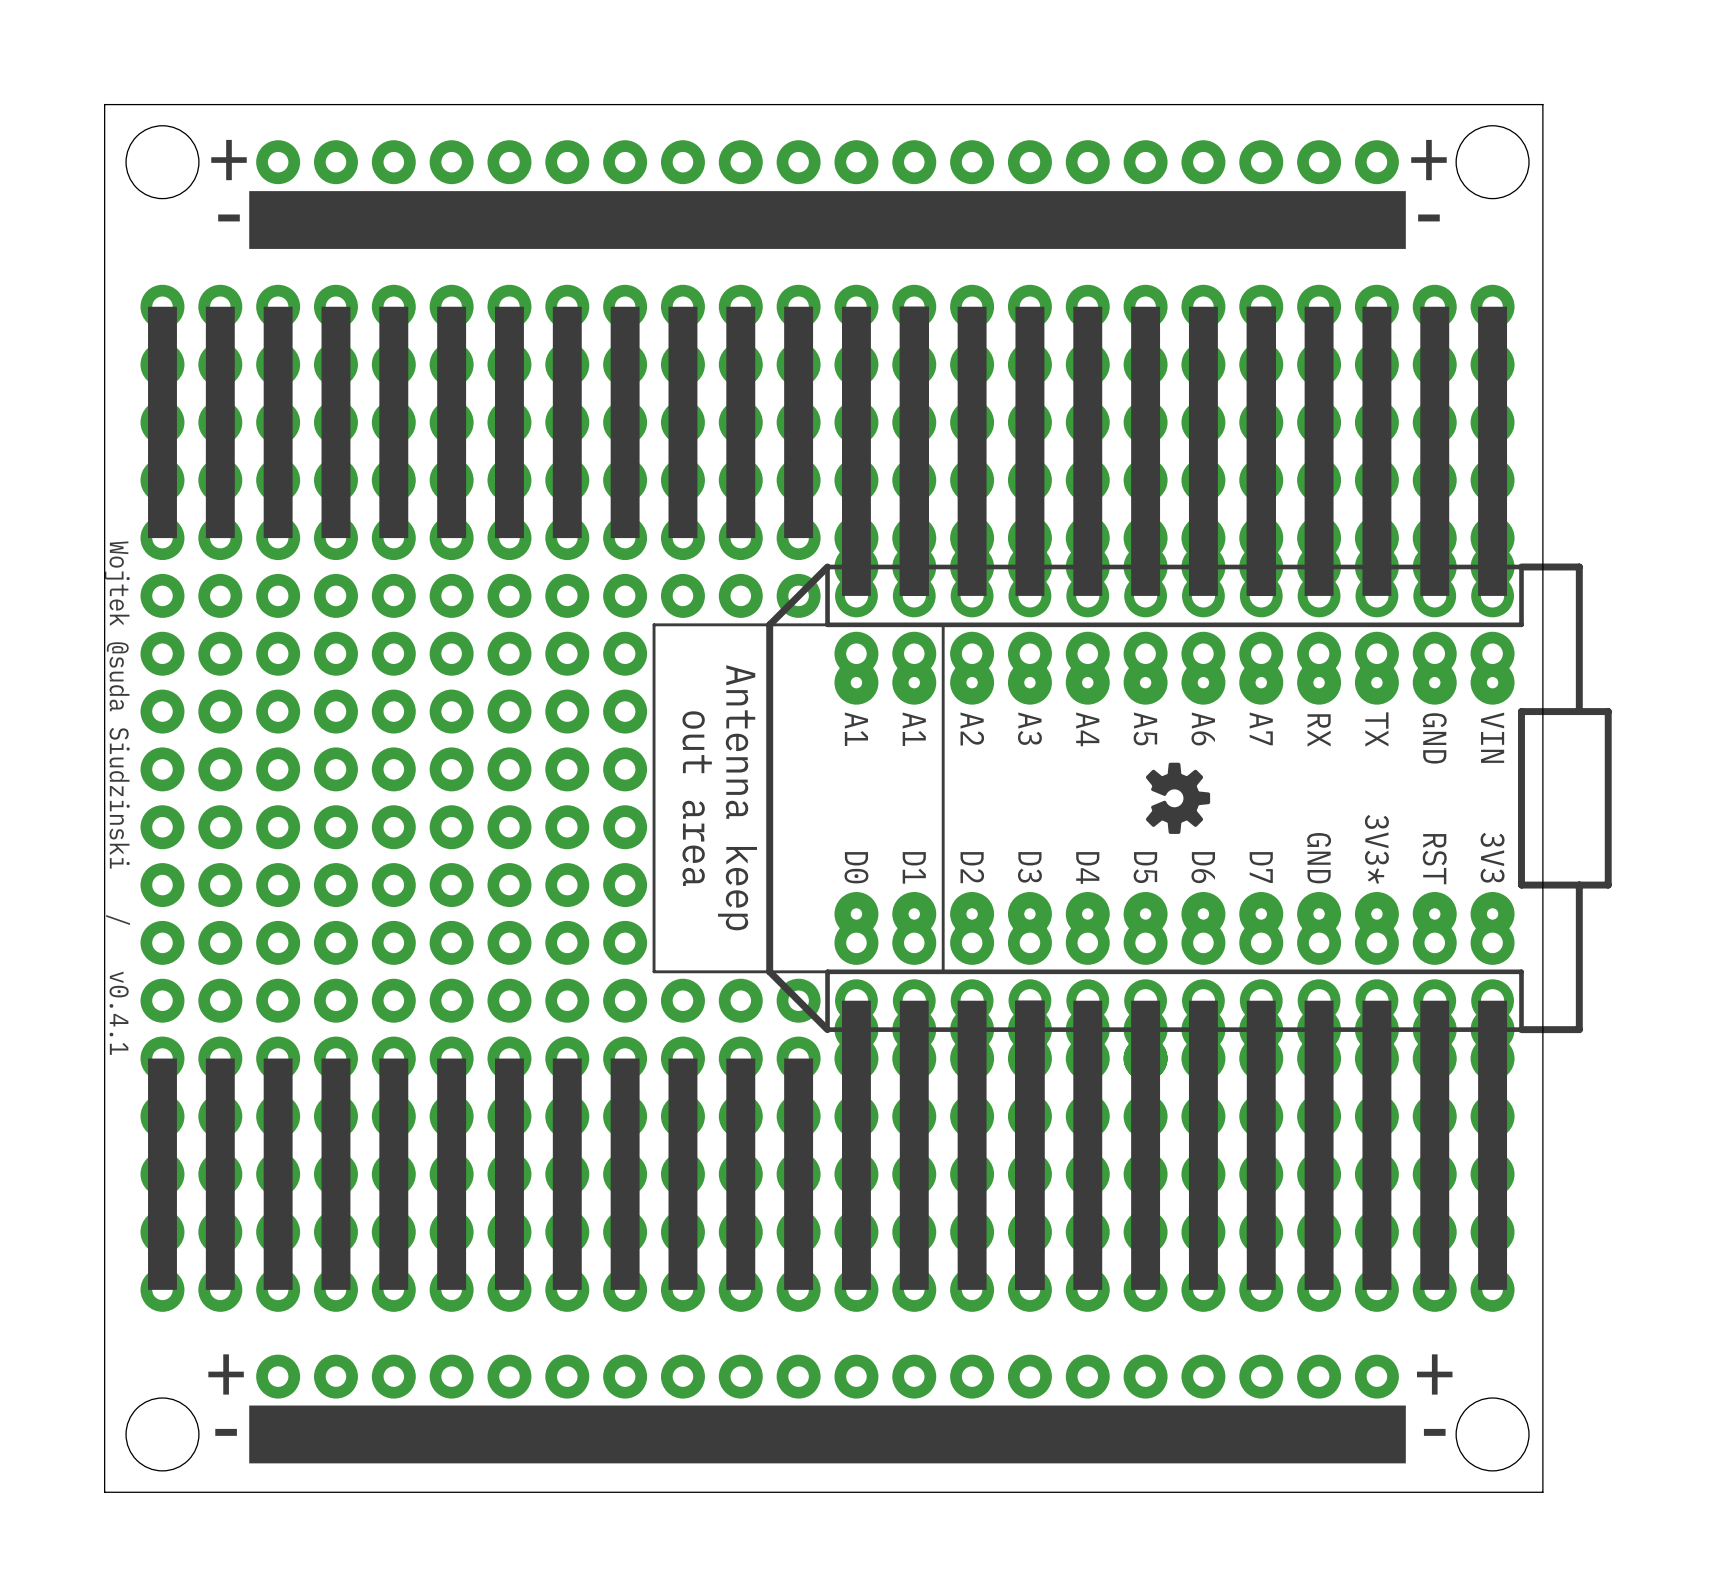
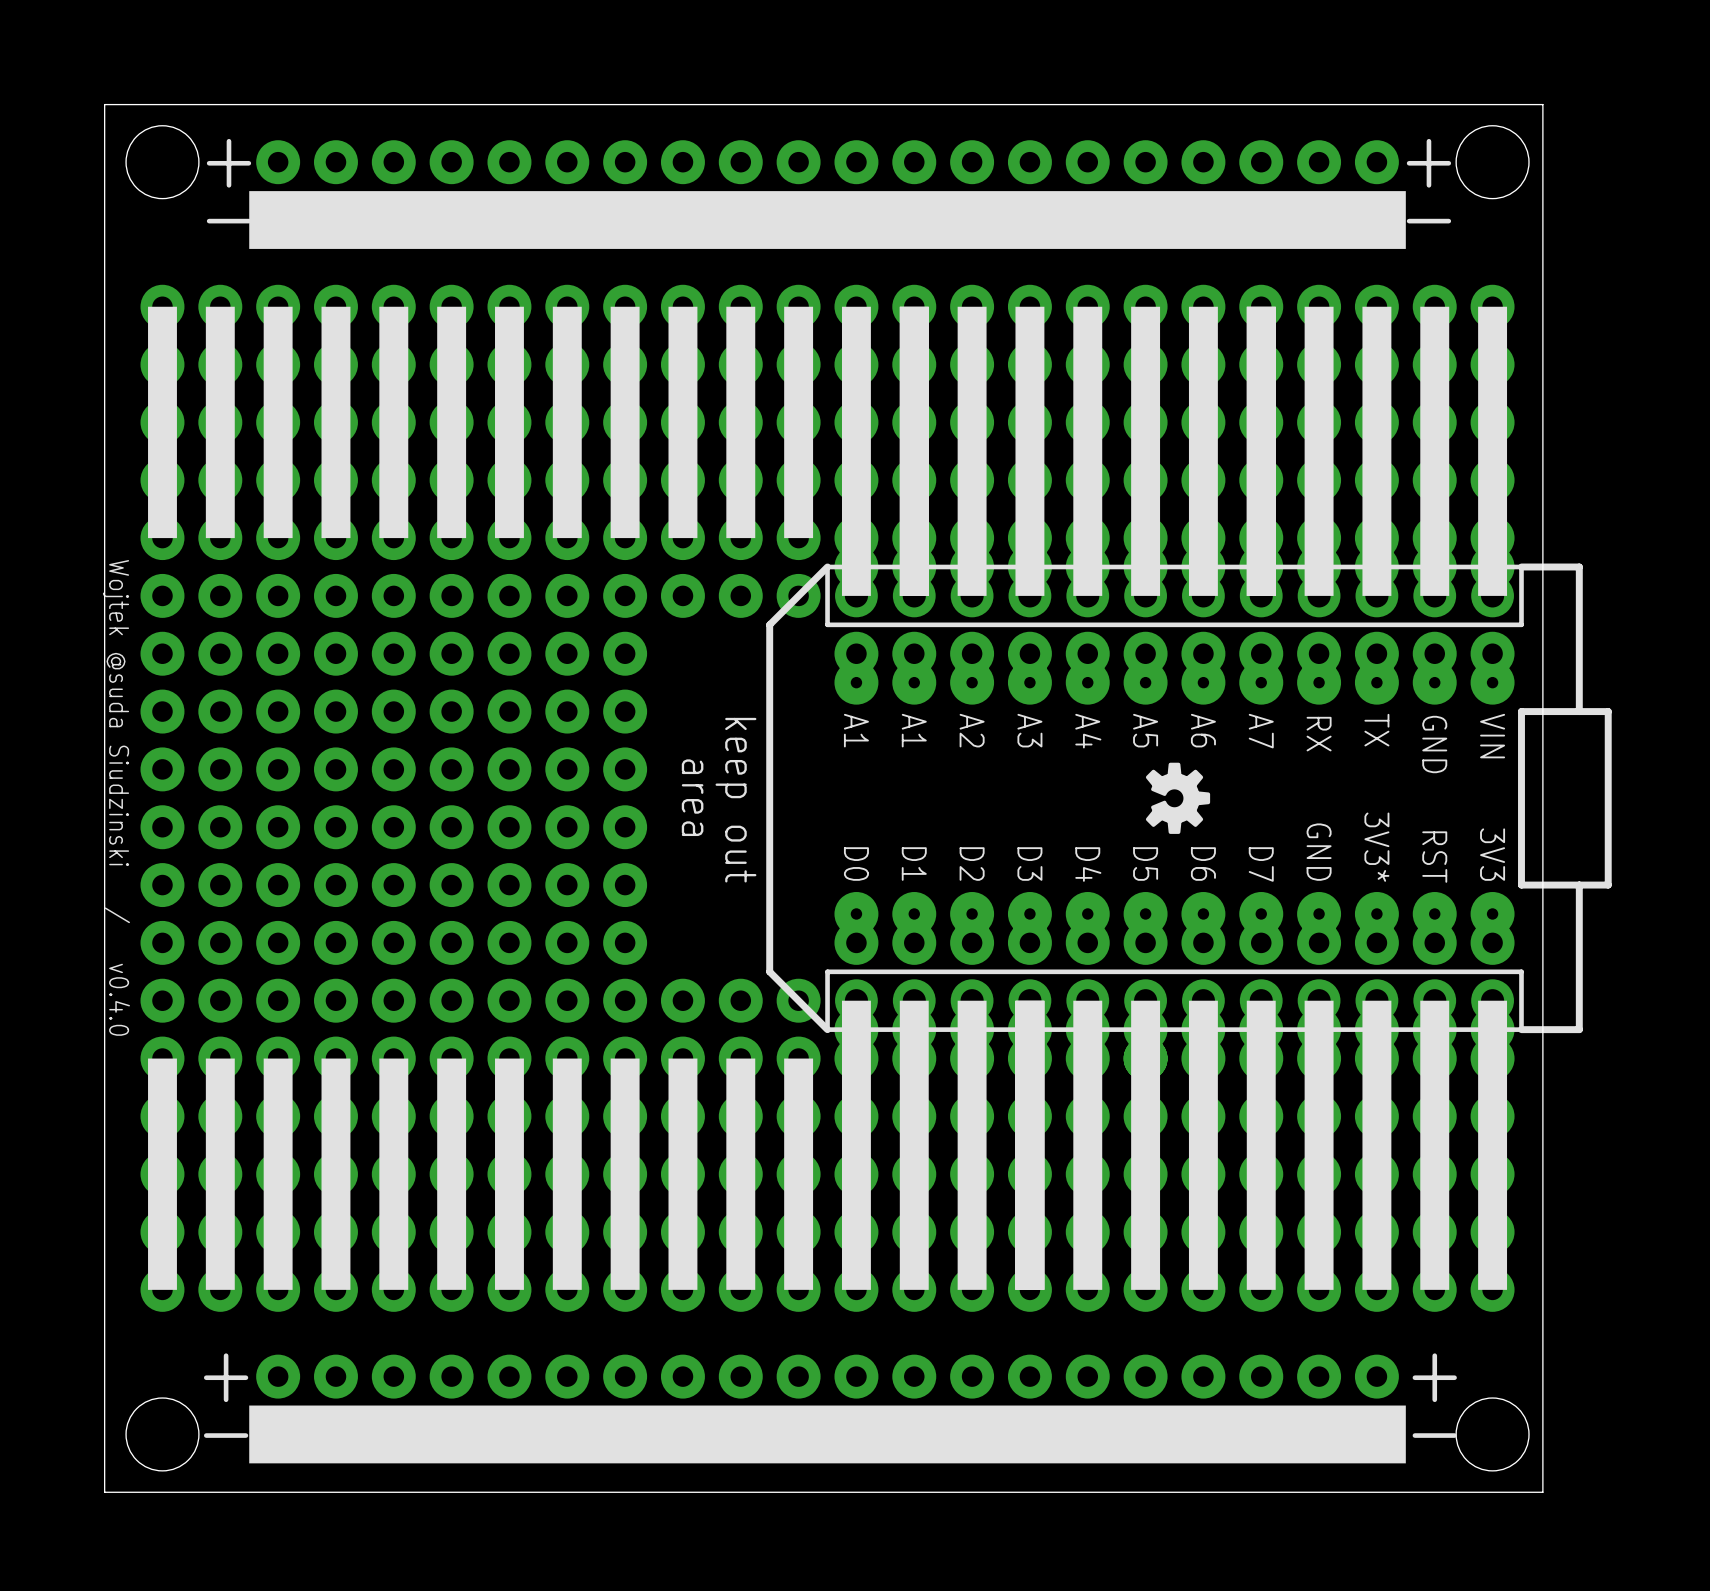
line: (654, 624) (654, 971) (943, 971) (943, 624) (654, 624) -> none
text: Antenna keep (737, 797) -> keep out (735, 800)
text: Wojtek @suda Siudzinski / v0.4.1 (117, 798) -> Wojtek @suda Siudzinski / v0.4.0 (116, 797)
text: out area (697, 798) -> area (692, 797)

